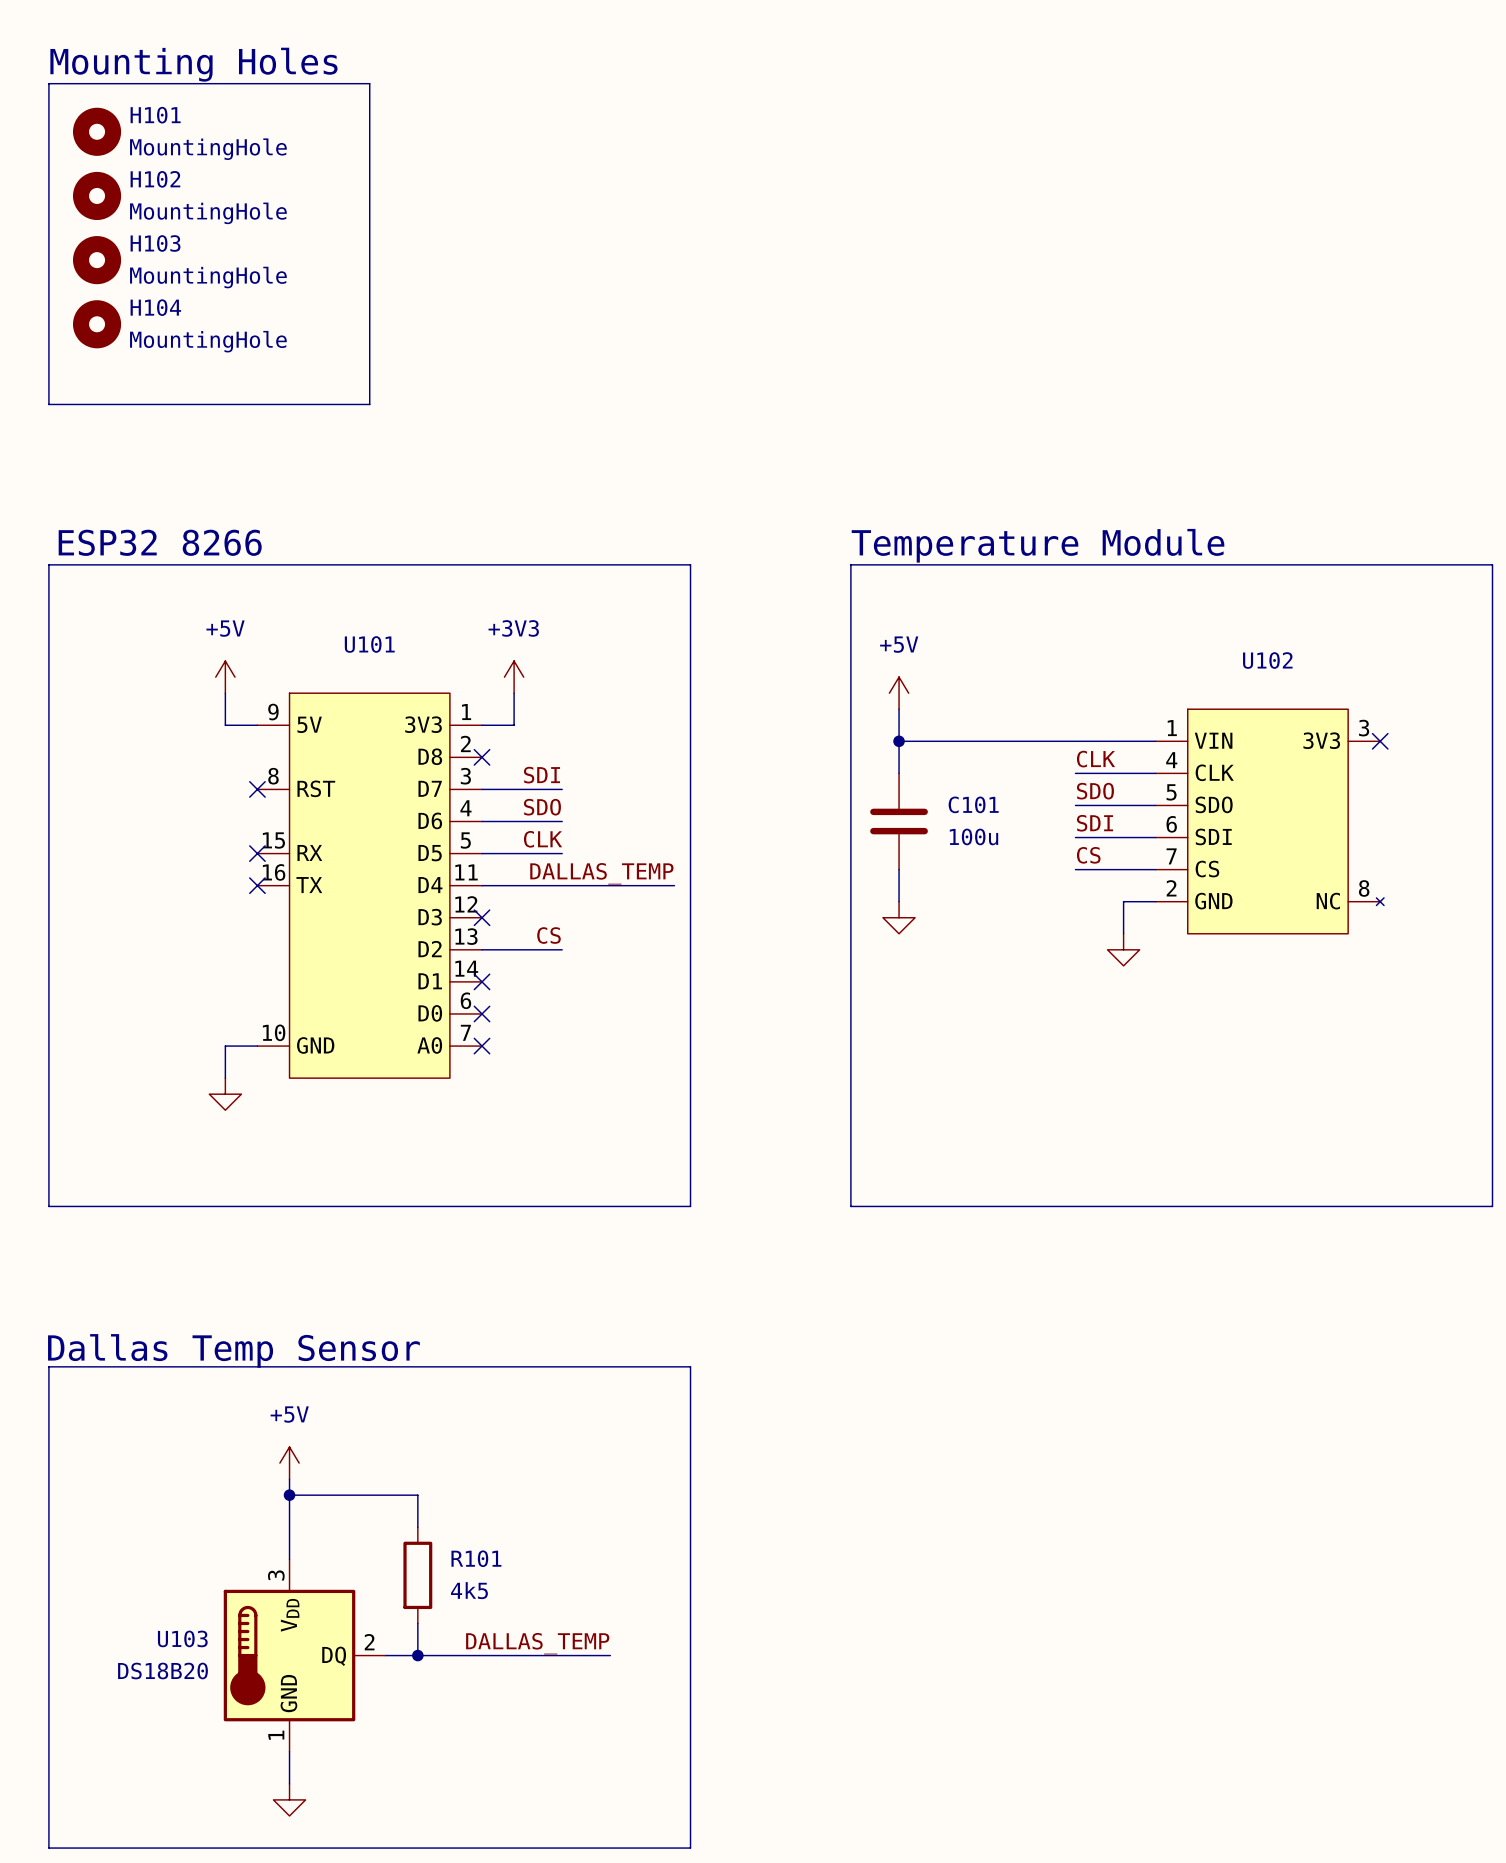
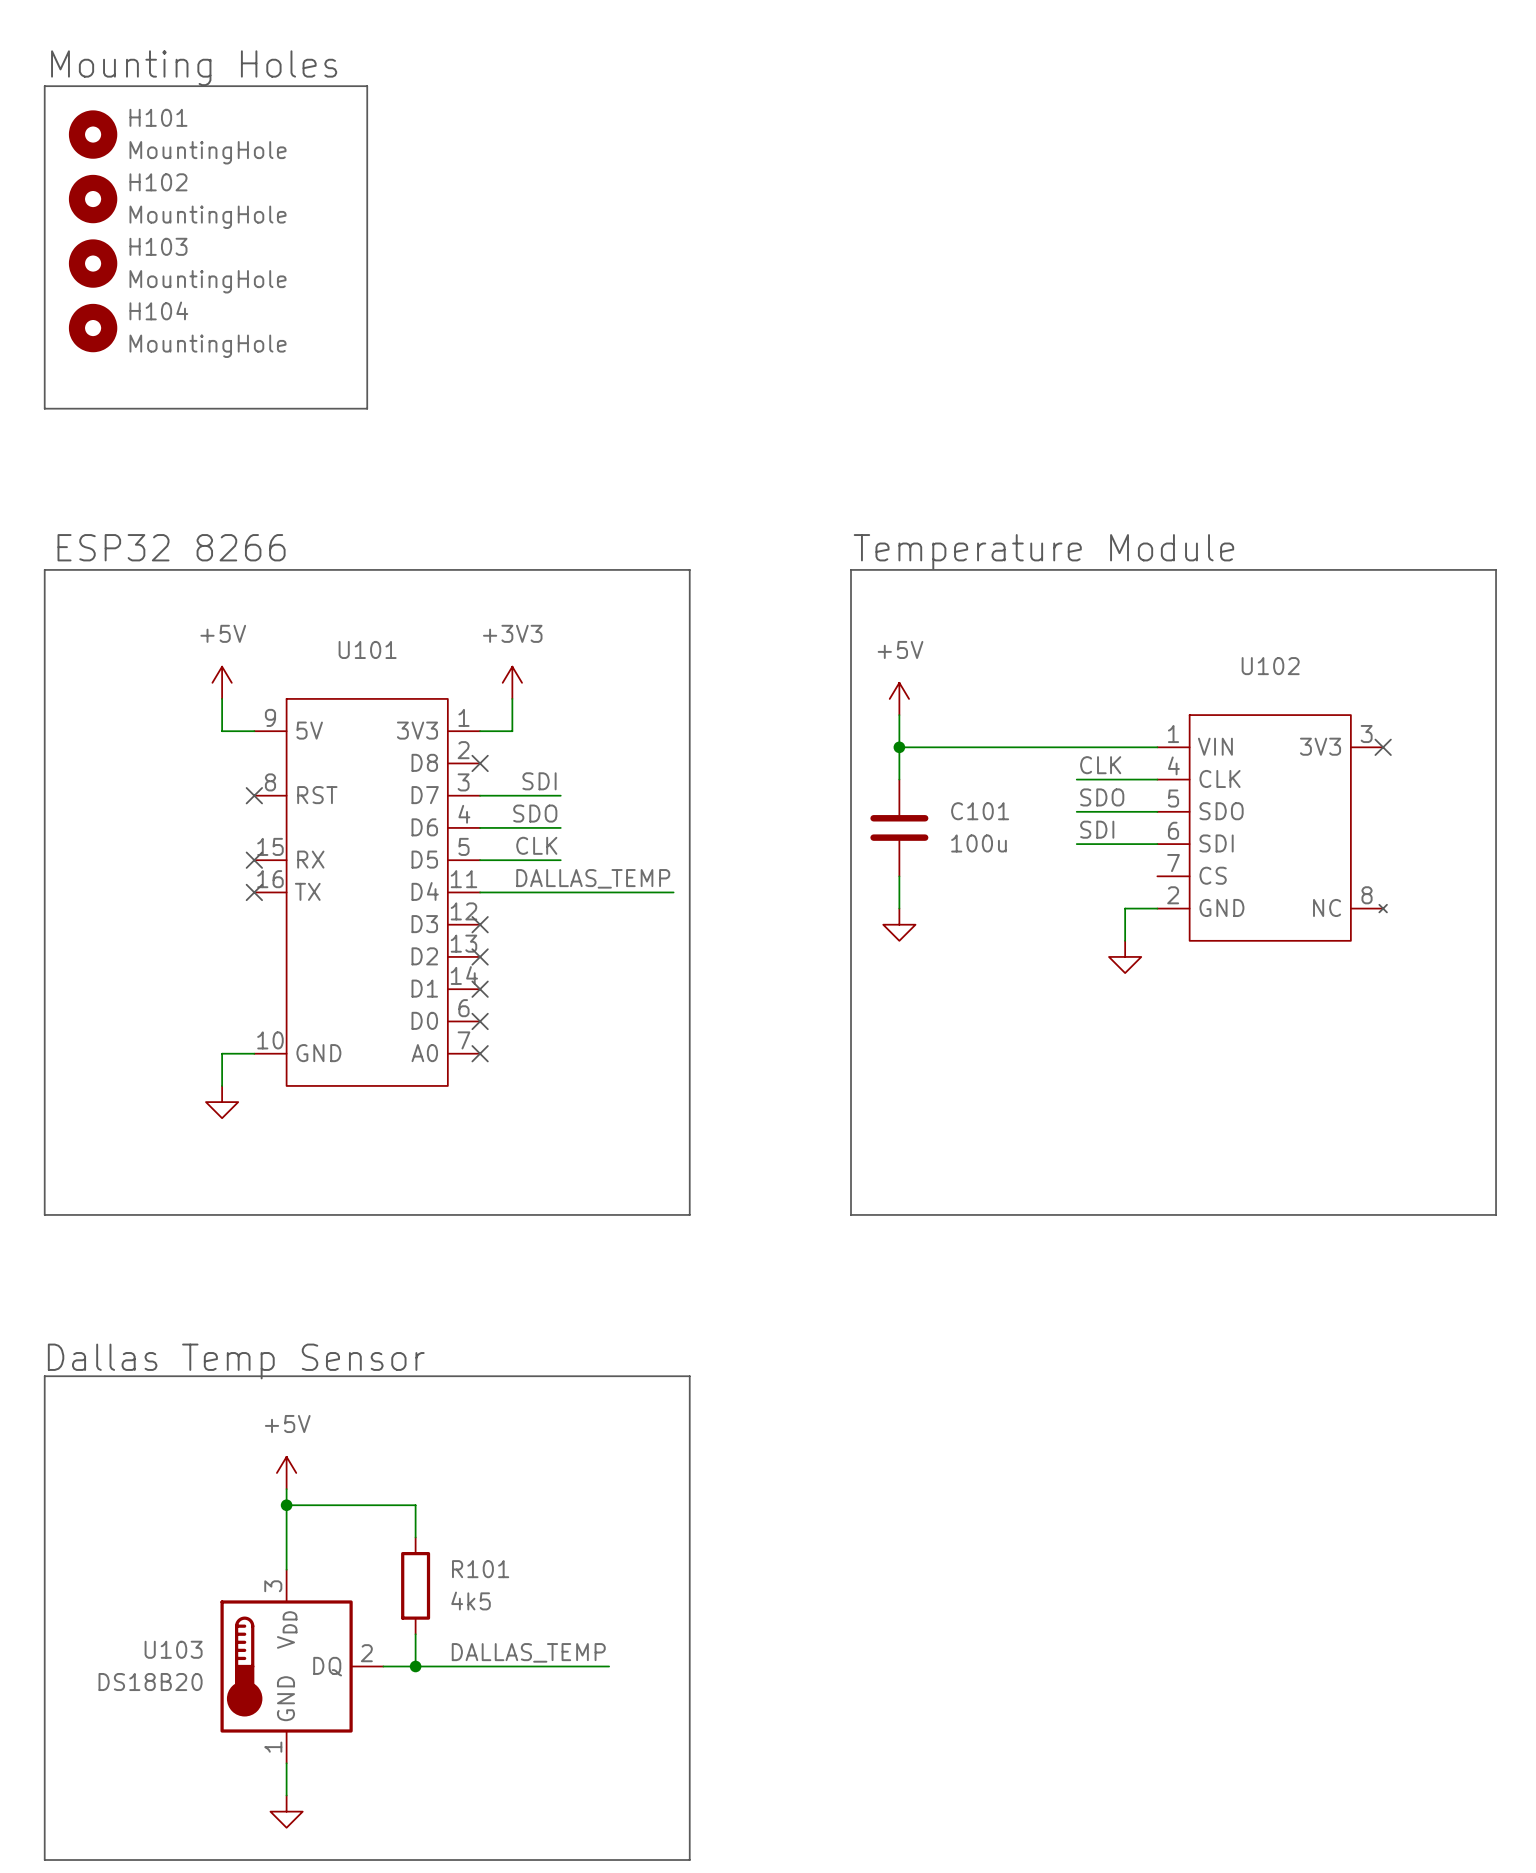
label: CS (1088, 855) -> none
wire: (1075, 869) (1155, 869) -> none
label: CS (548, 935) -> none
wire: (482, 949) (562, 949) -> none
no-connect mark: none -> (480, 956)

